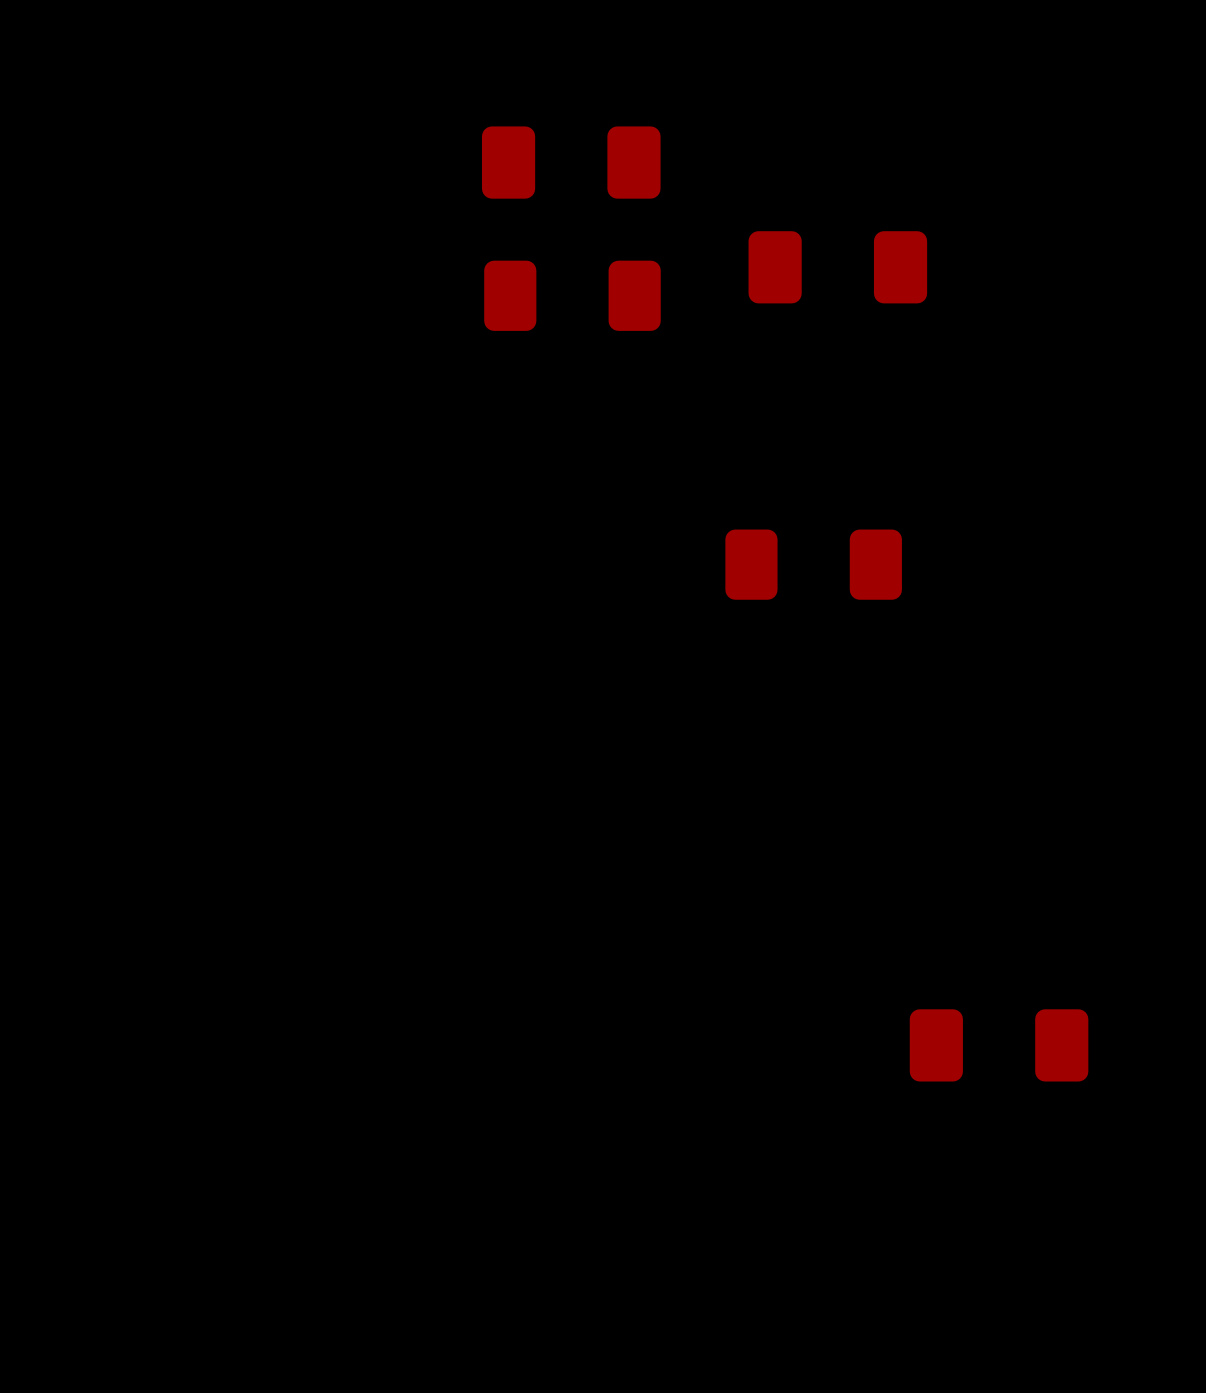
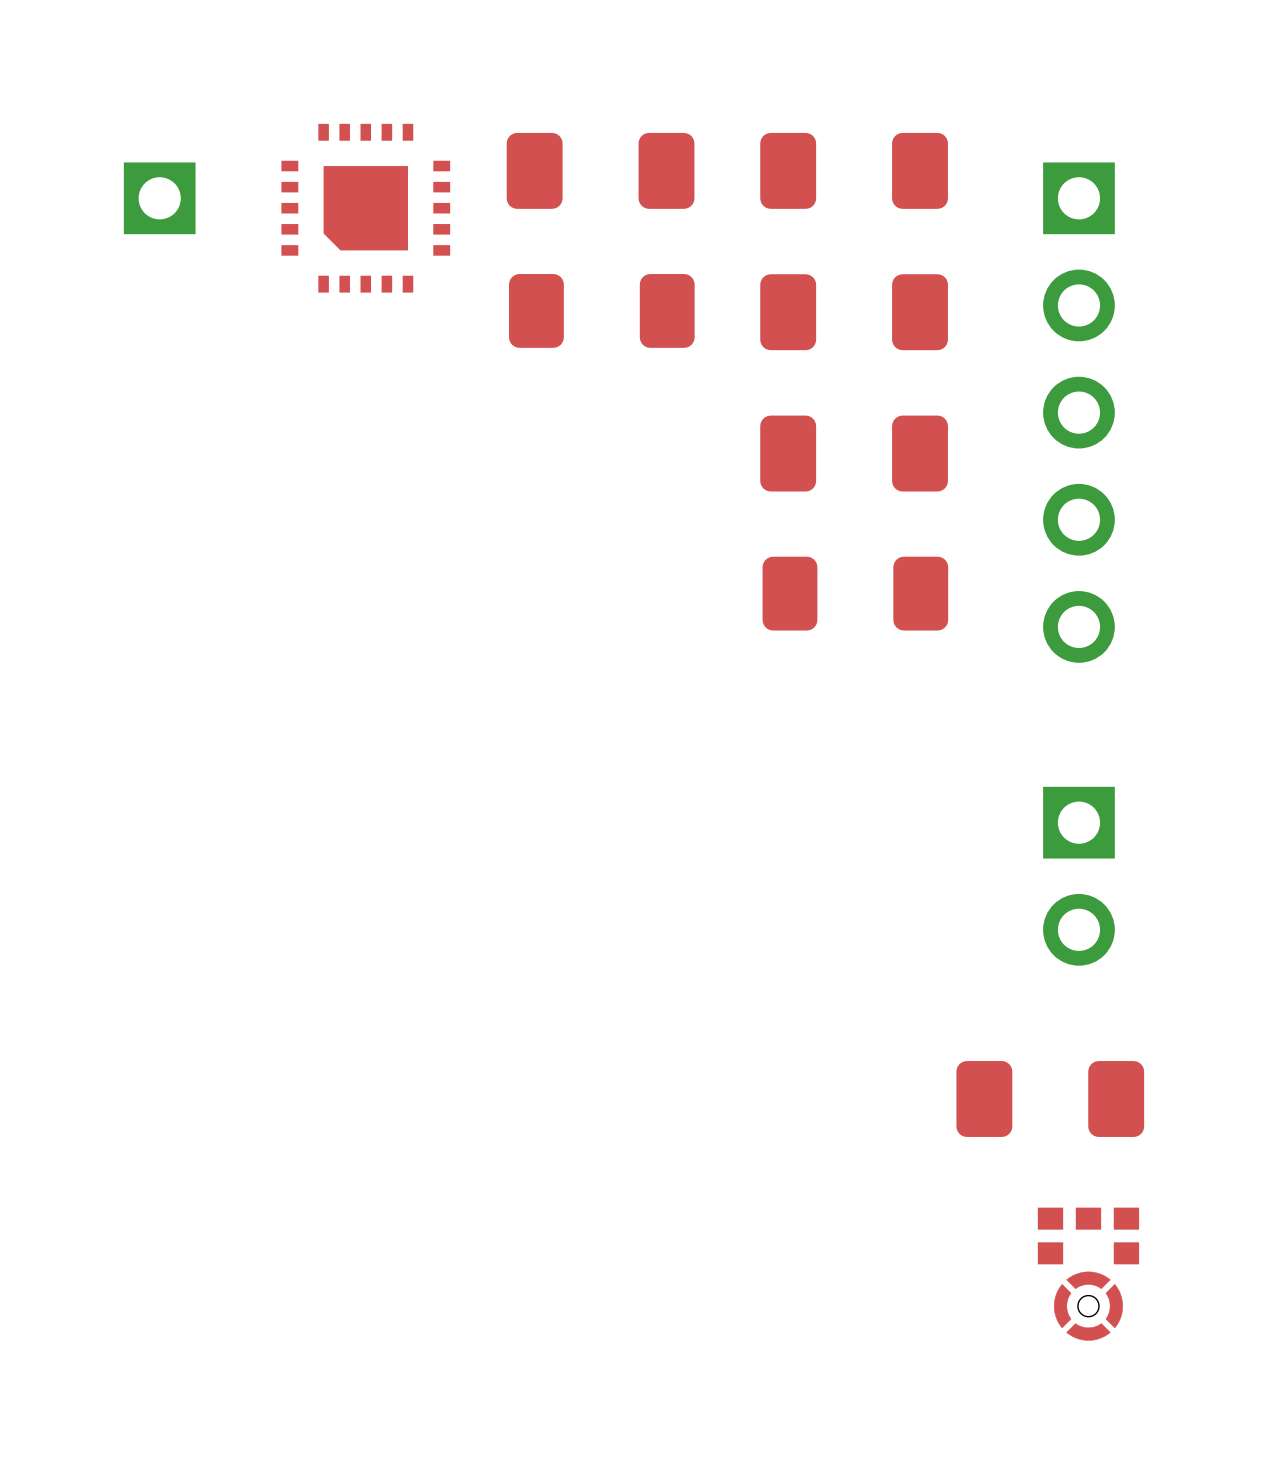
part: none -> (854, 170)
part: none -> (159, 198)
part: none -> (365, 208)
part position: (837, 267) -> (854, 312)
part: none -> (1078, 412)
part: none -> (854, 453)
part: none -> (1078, 876)
part: none -> (1088, 1274)

